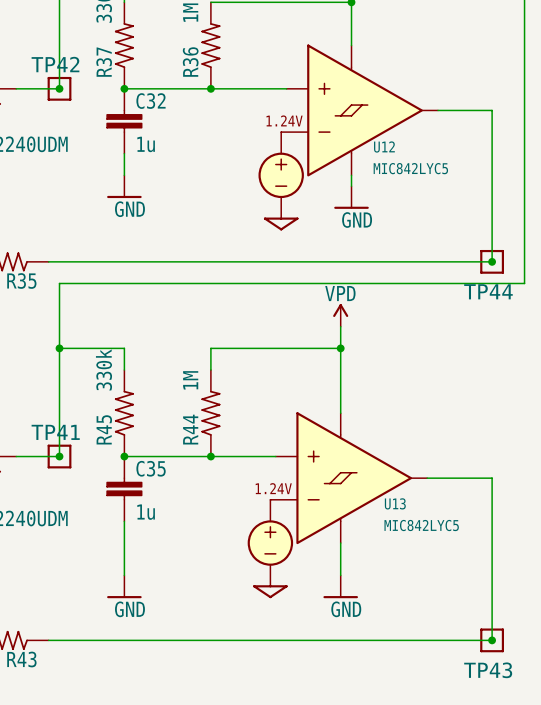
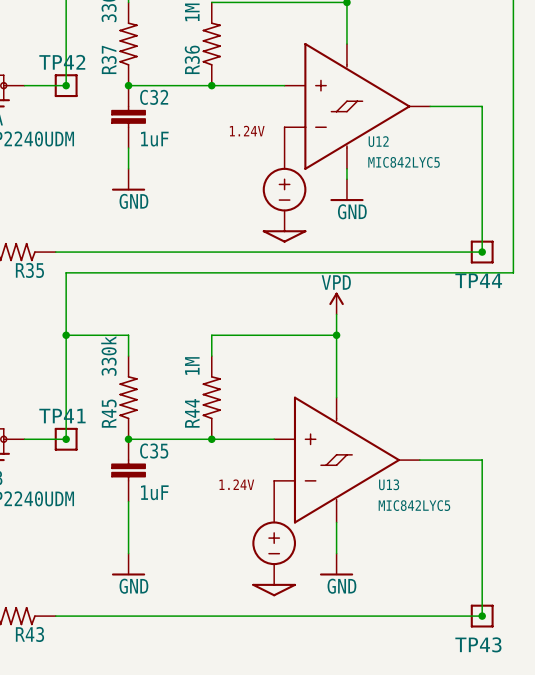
U12 symbol: [258, 44, 439, 231] -> [262, 42, 431, 243]
C32 value: 1u (146, 144) -> 1uF (154, 139)
U13 symbol: [247, 412, 428, 599] -> [252, 396, 420, 597]
C35 value: 1u (146, 512) -> 1uF (154, 492)

